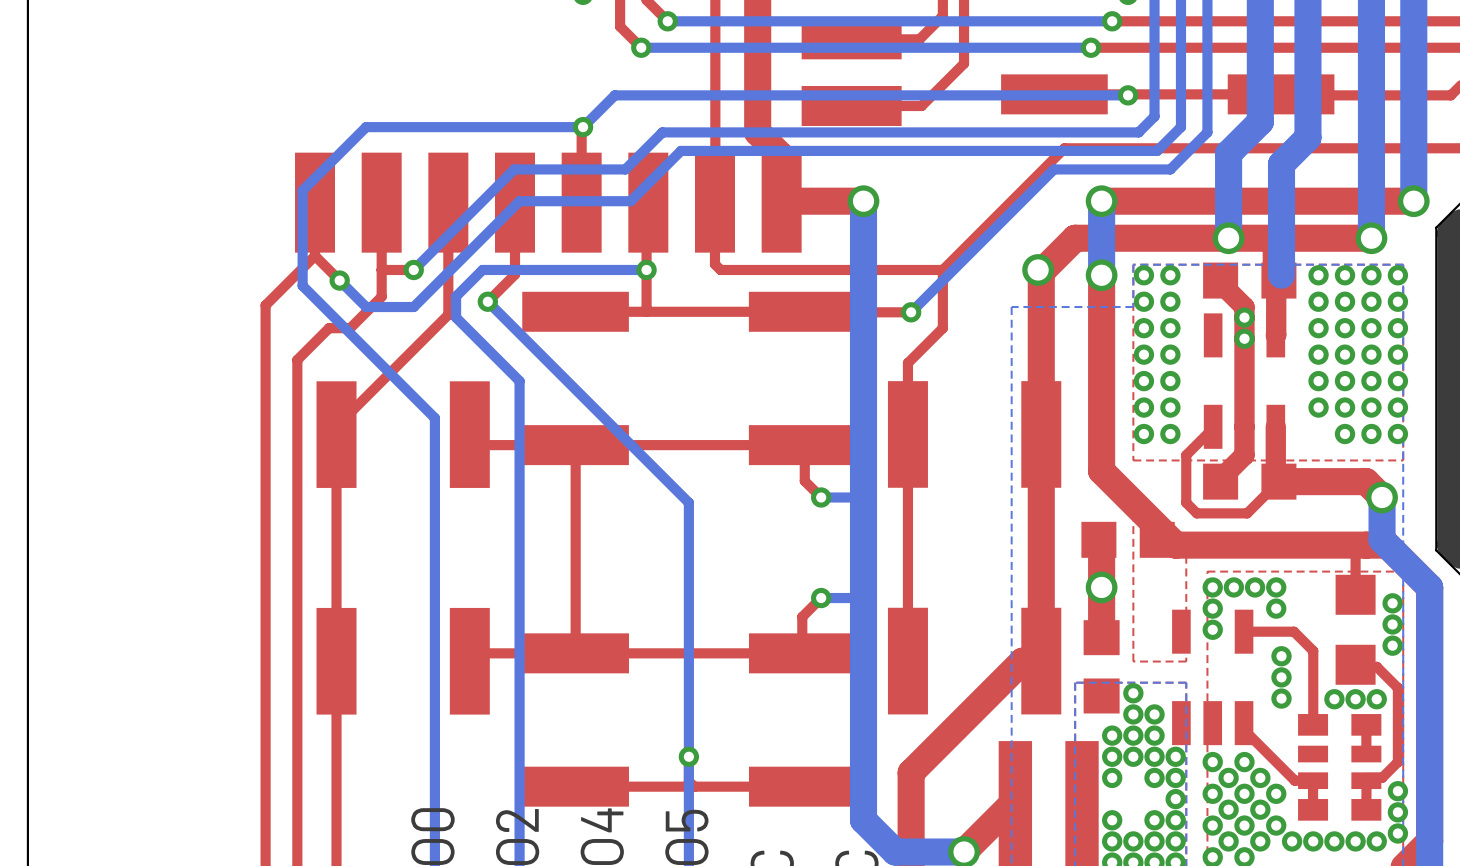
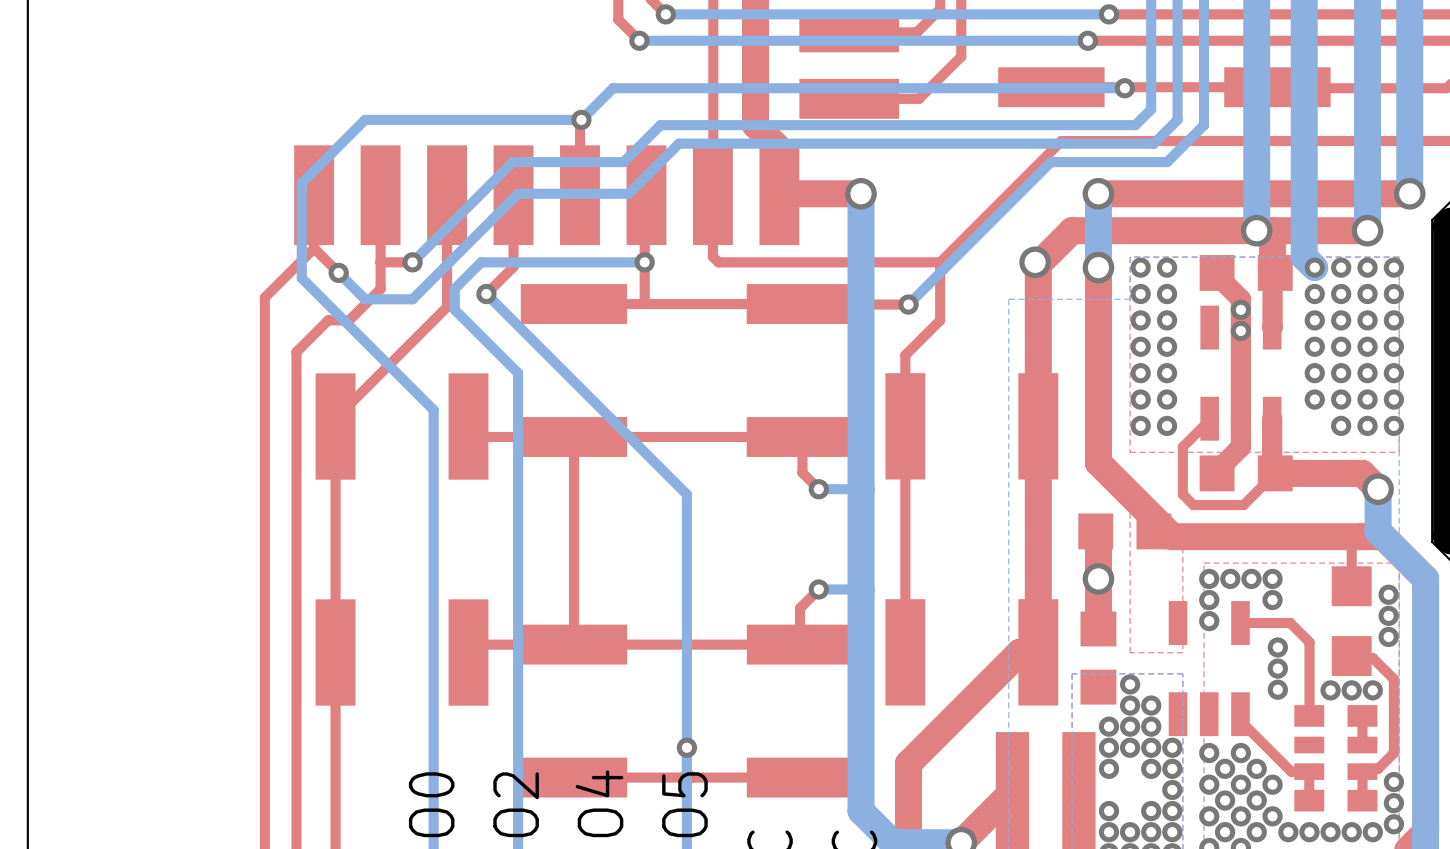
bottom track: (1260, 121) (1228, 153) (1228, 238) -> (1256, 114) (1256, 230)
bottom track: (1307, 137) (1281, 164) (1281, 275) -> (1304, 130) (1304, 257) (1314, 267)
via position: (1228, 238) -> (1256, 230)

